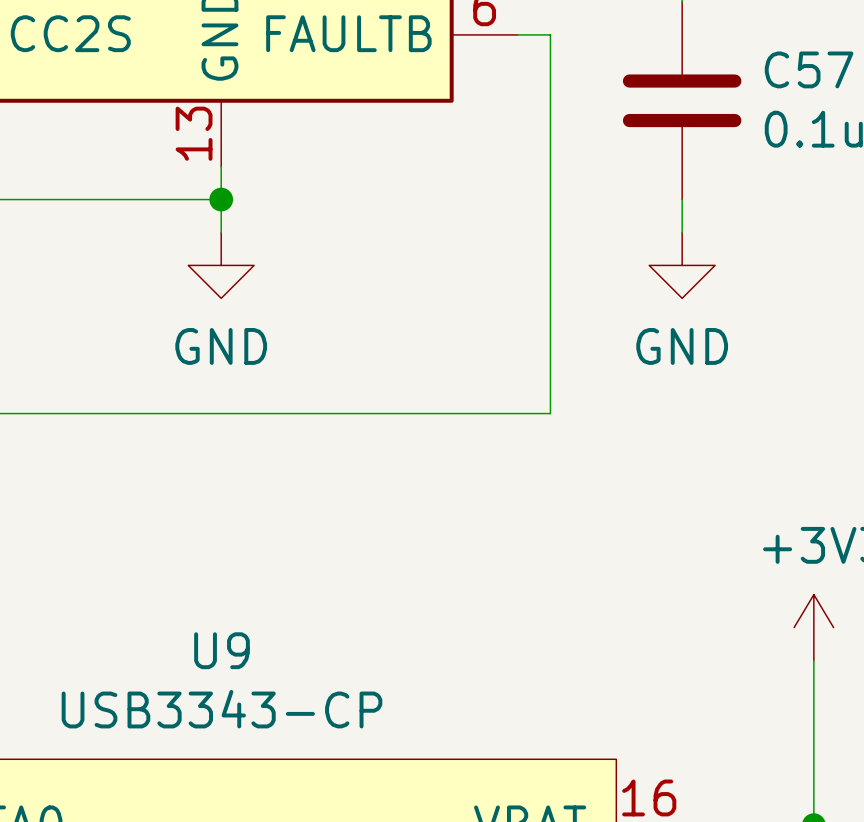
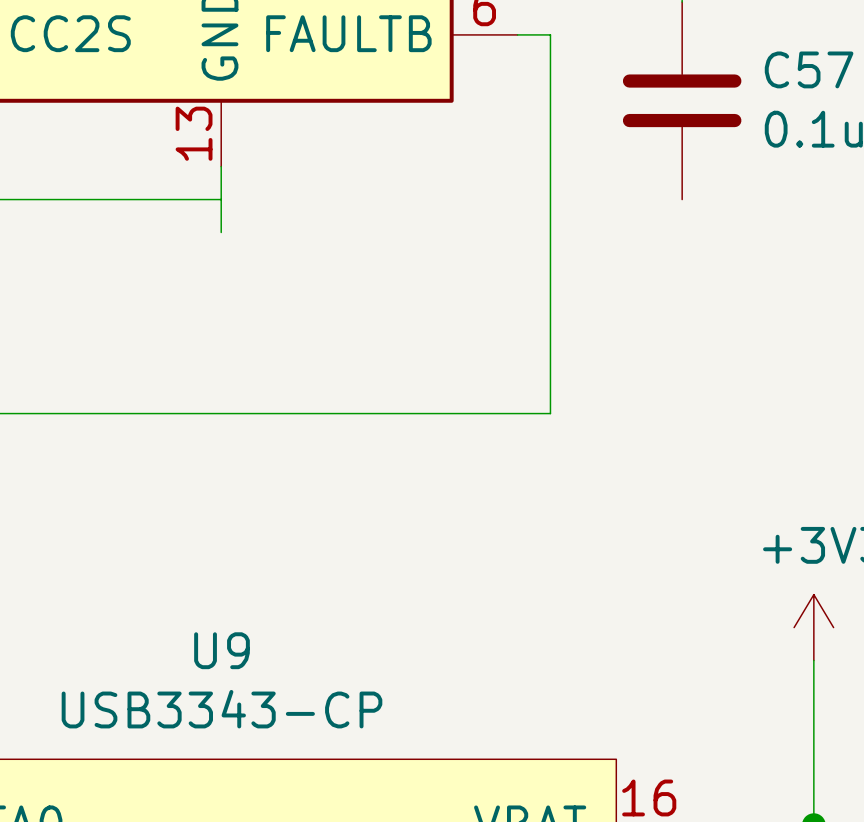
junction: (221, 199) -> none
wire: (682, 199) (682, 232) -> none
power symbol: GND (221, 265) -> none
power symbol: GND (682, 265) -> none

